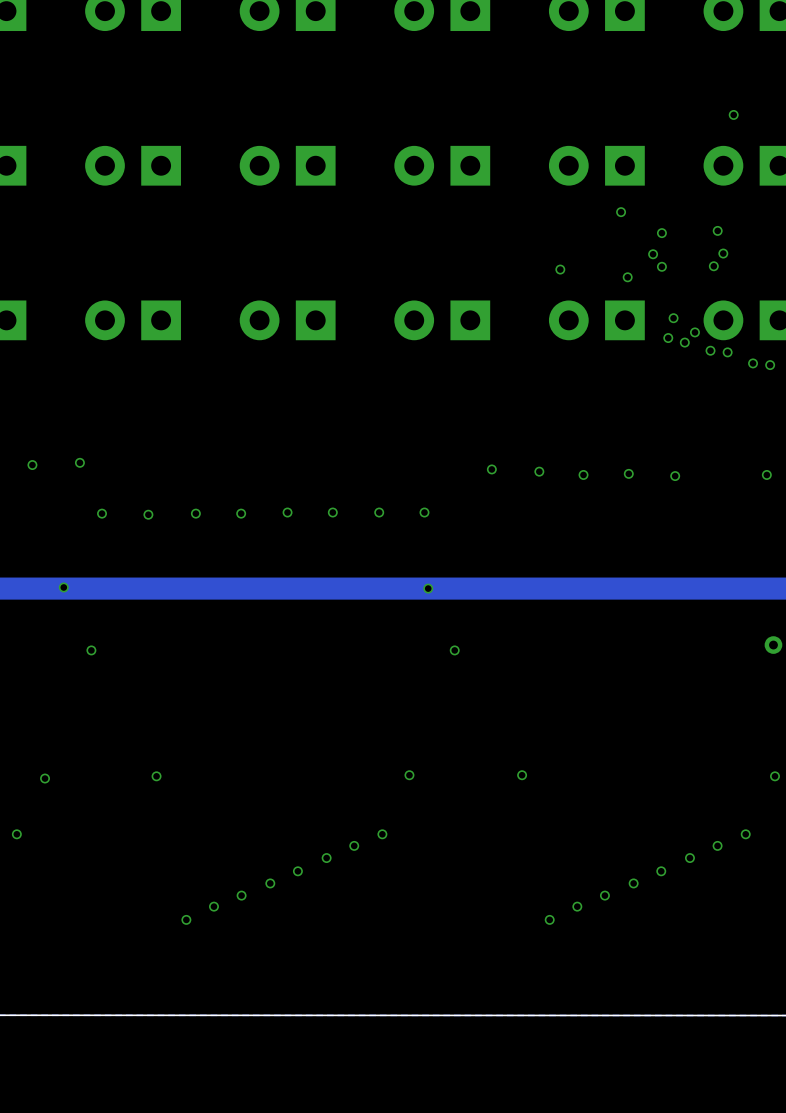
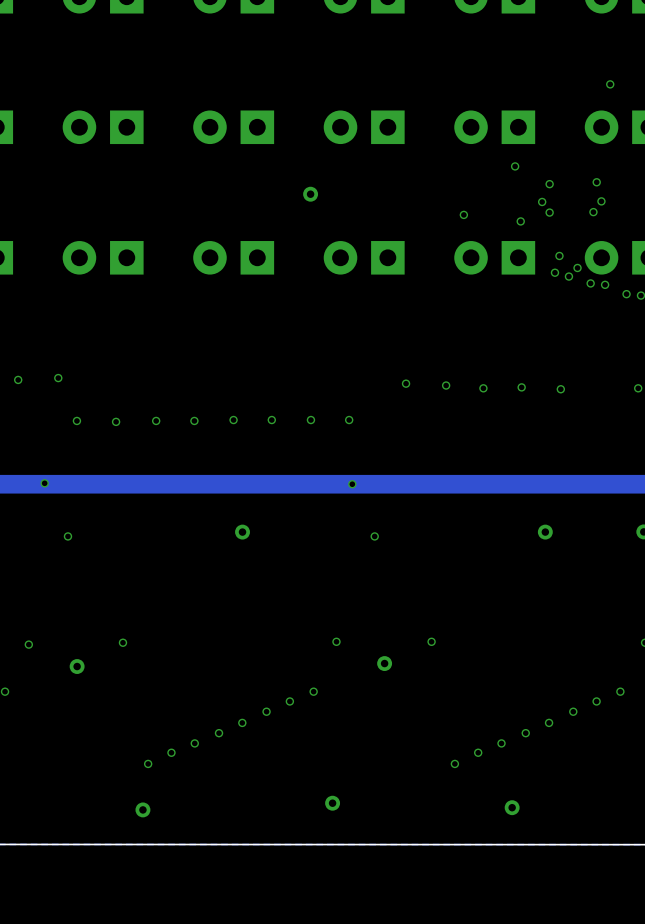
via: none -> (310, 194)
via: none -> (242, 532)
via: none -> (545, 532)
via: none -> (384, 663)
via: none -> (77, 666)
via: none -> (332, 803)
via: none -> (512, 807)
via: none -> (142, 809)

